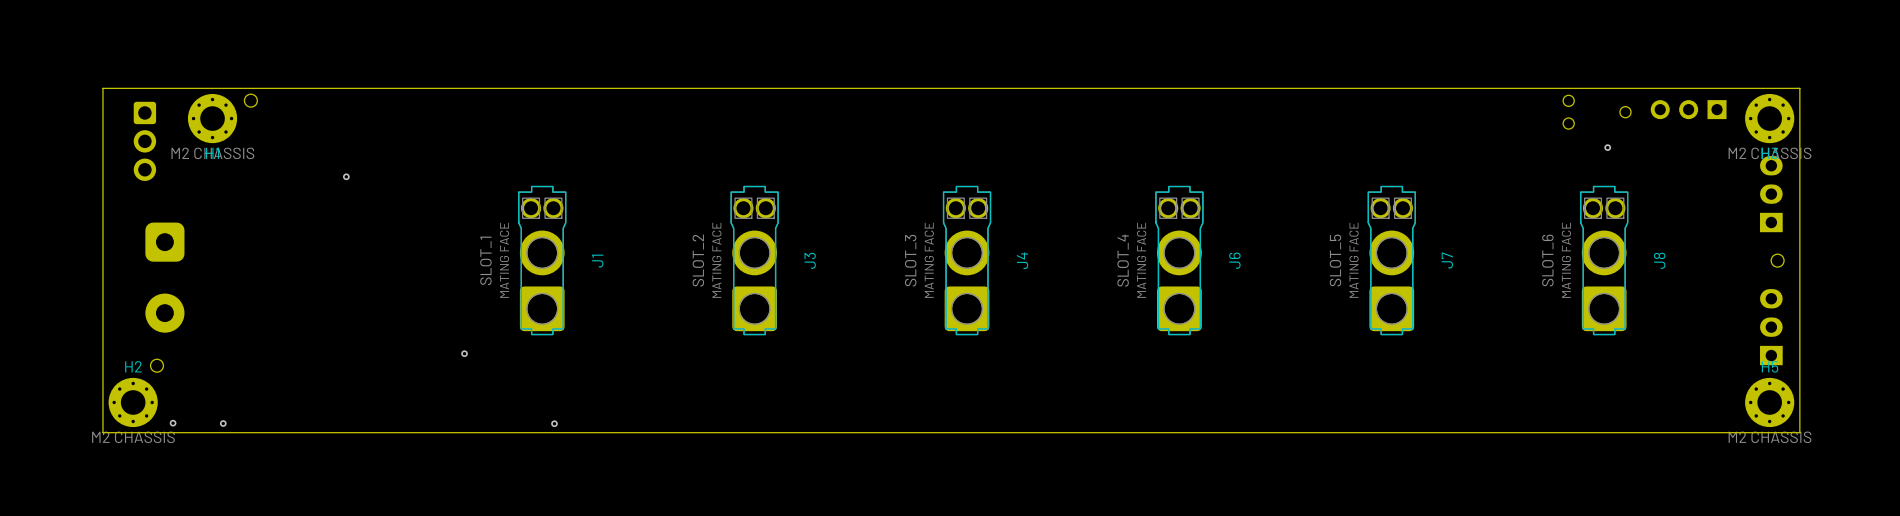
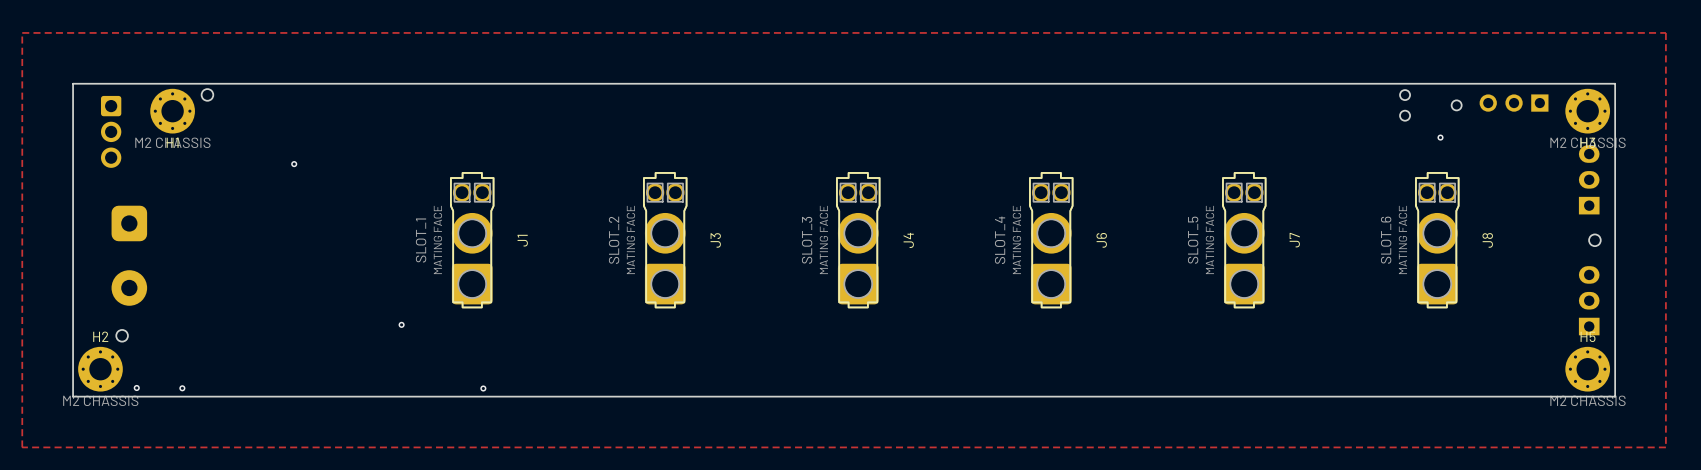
zone outline: none -> (22, 32) (1665, 32) (1665, 447) (22, 447) (22, 32)

